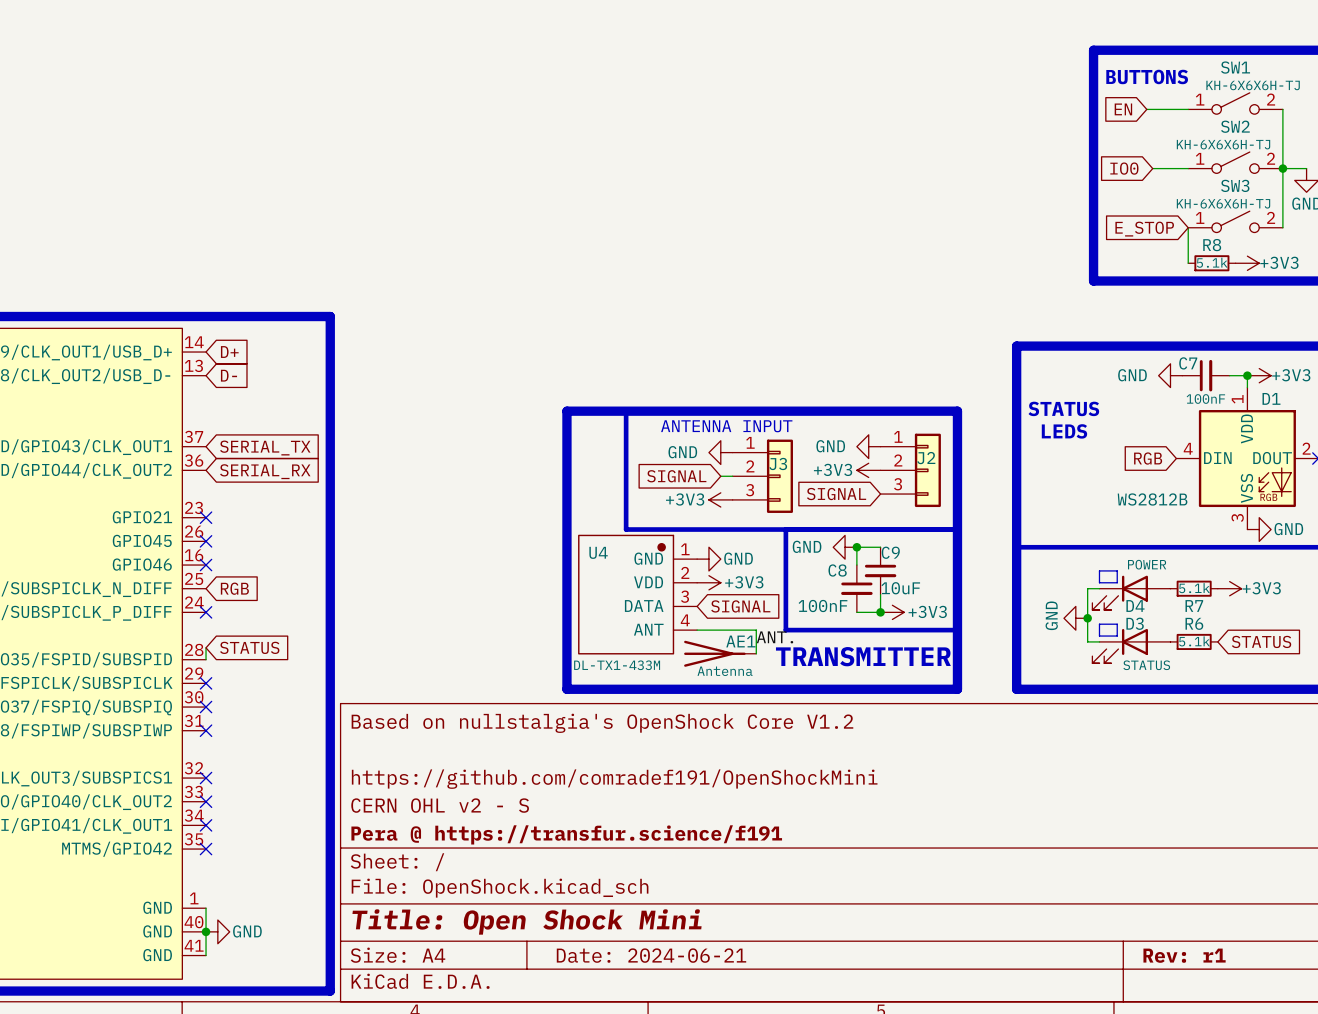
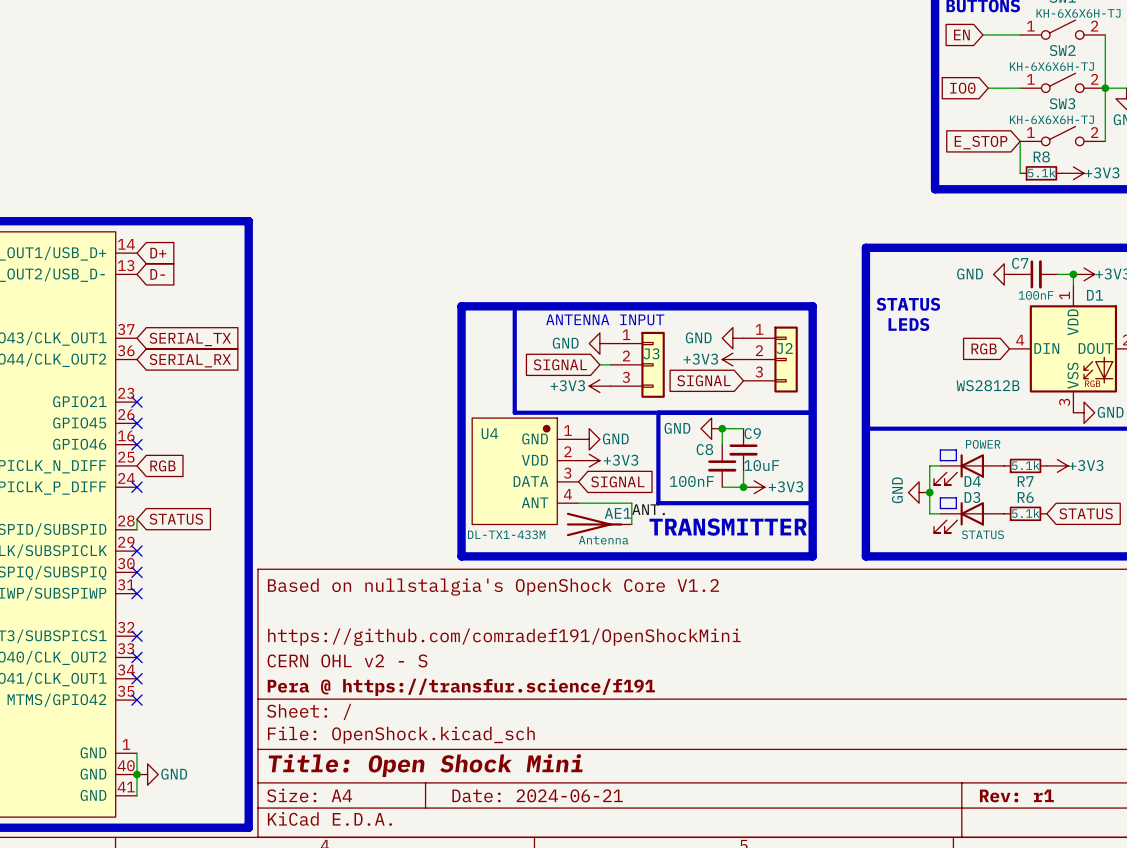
U4 symbol: [578, 534, 698, 655] -> [471, 417, 579, 526]

